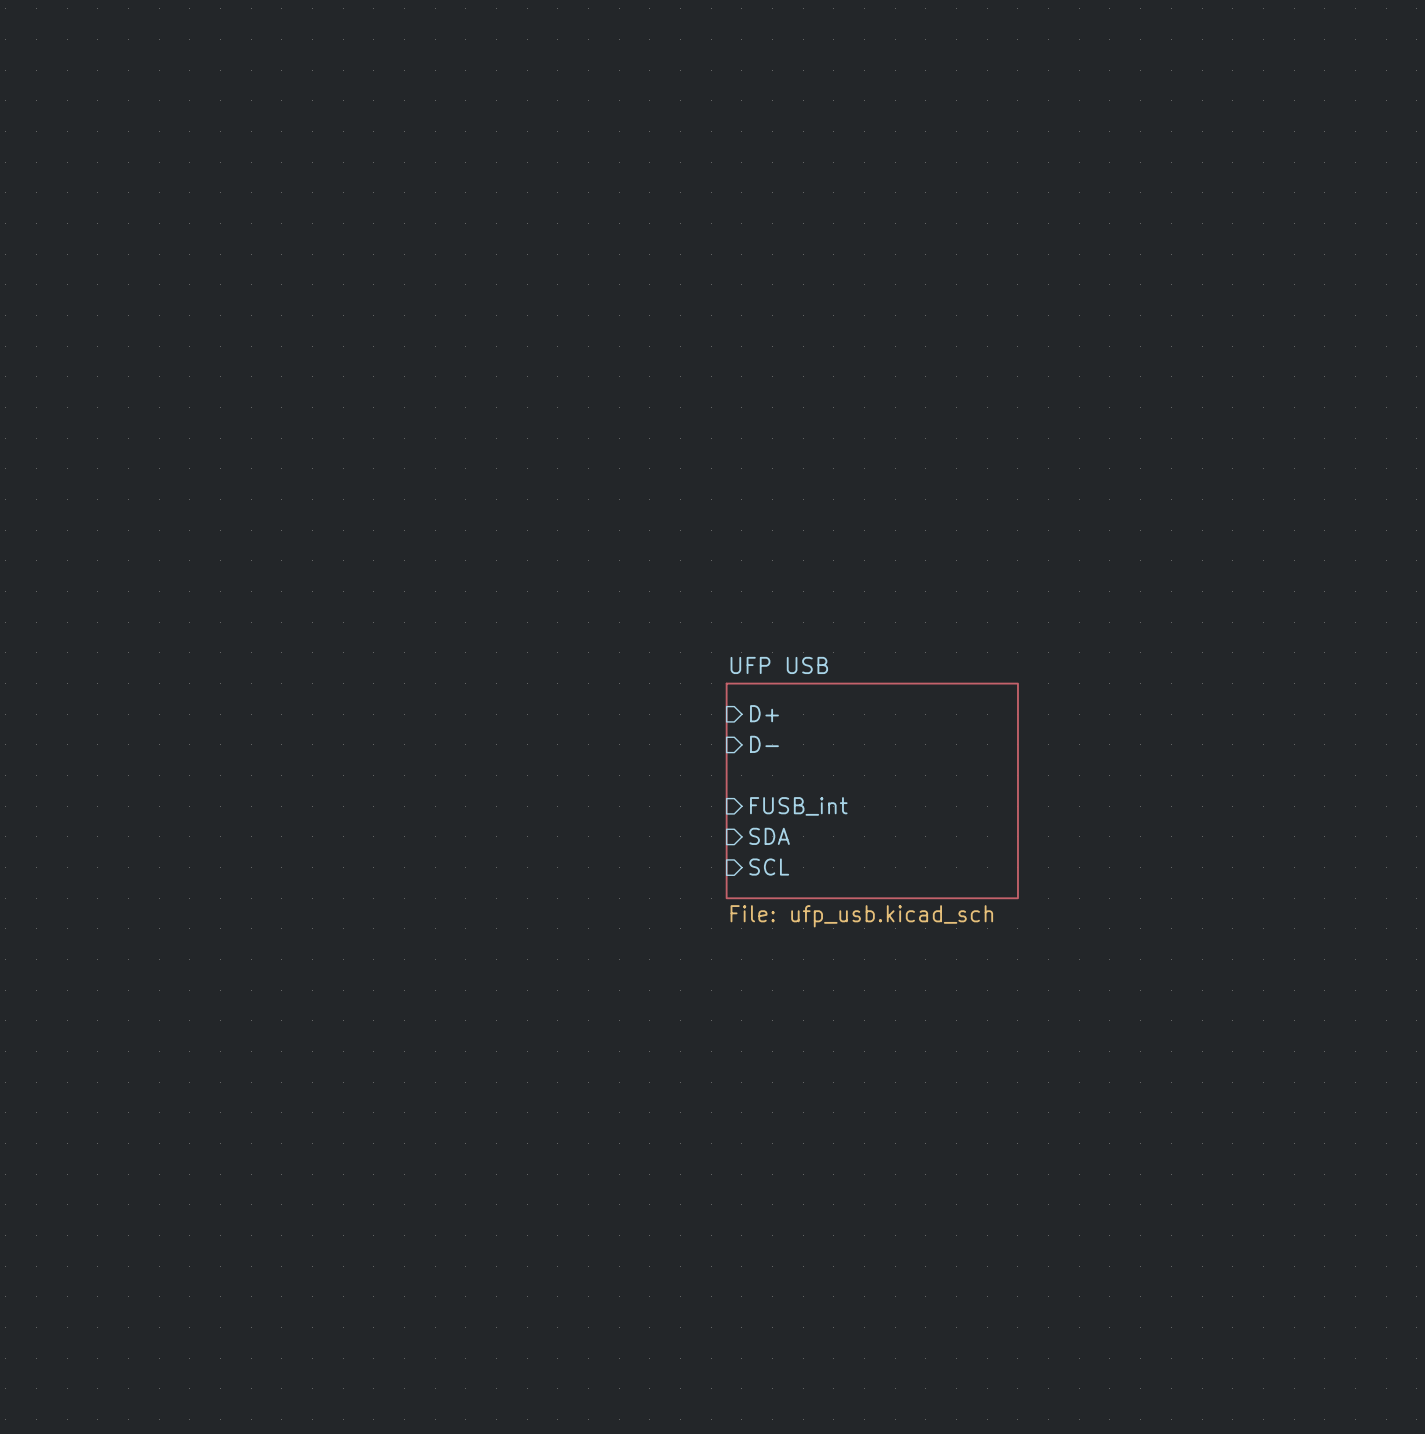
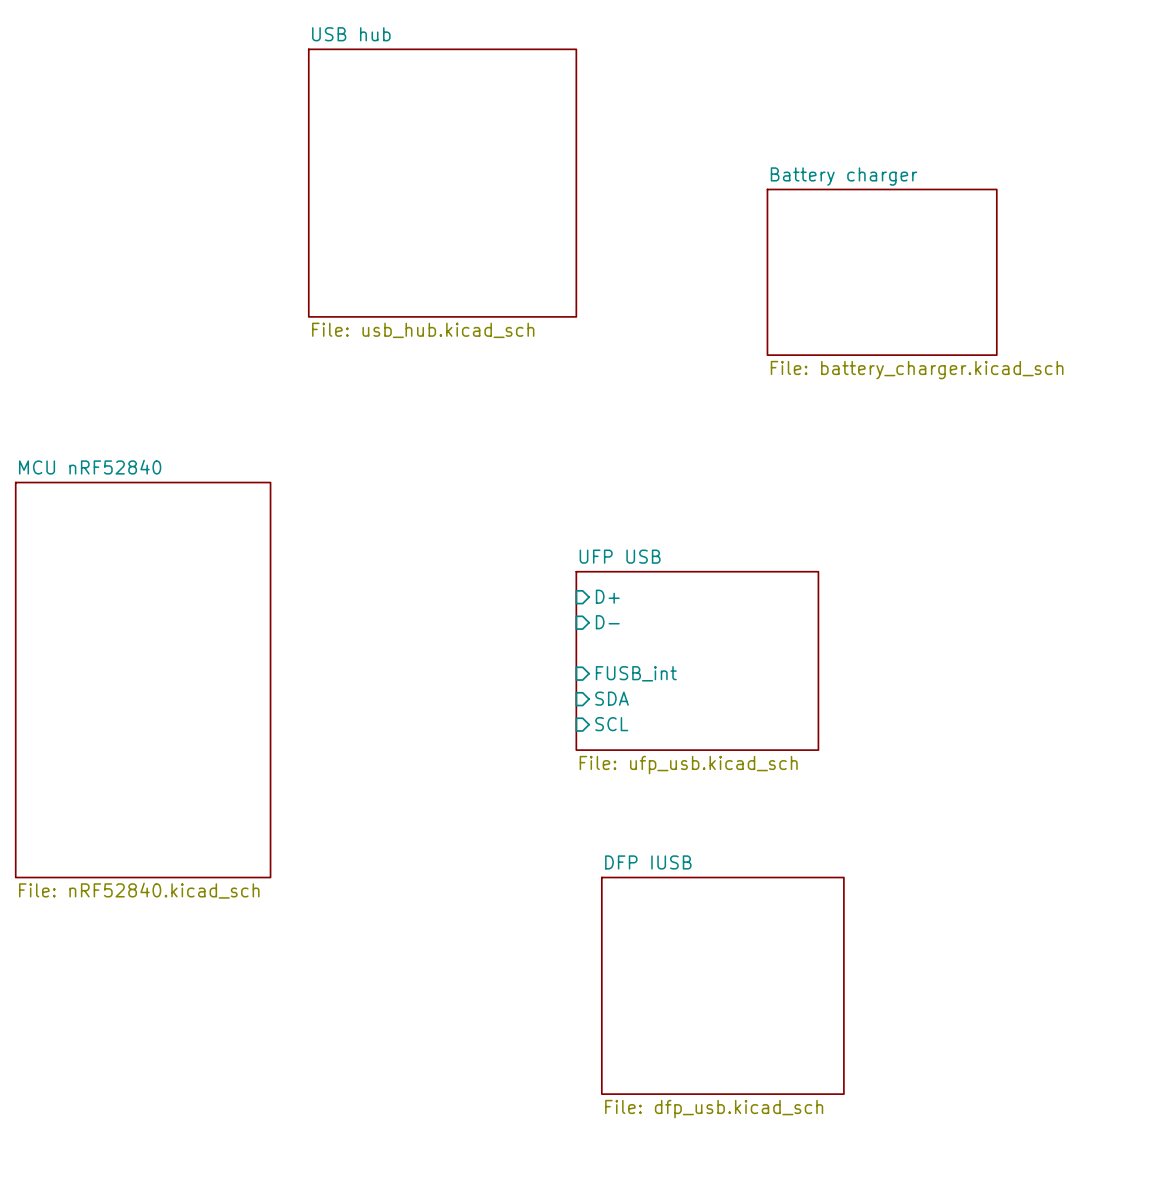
sheet USB hub: none -> File: usb_hub.kicad_sch (442, 183)
sheet Battery charger: none -> File: battery_charger.kicad_sch (882, 272)
sheet MCU nRF52840: none -> File: nRF52840.kicad_sch (143, 680)
sheet DFP IUSB: none -> File: dfp_usb.kicad_sch (722, 985)

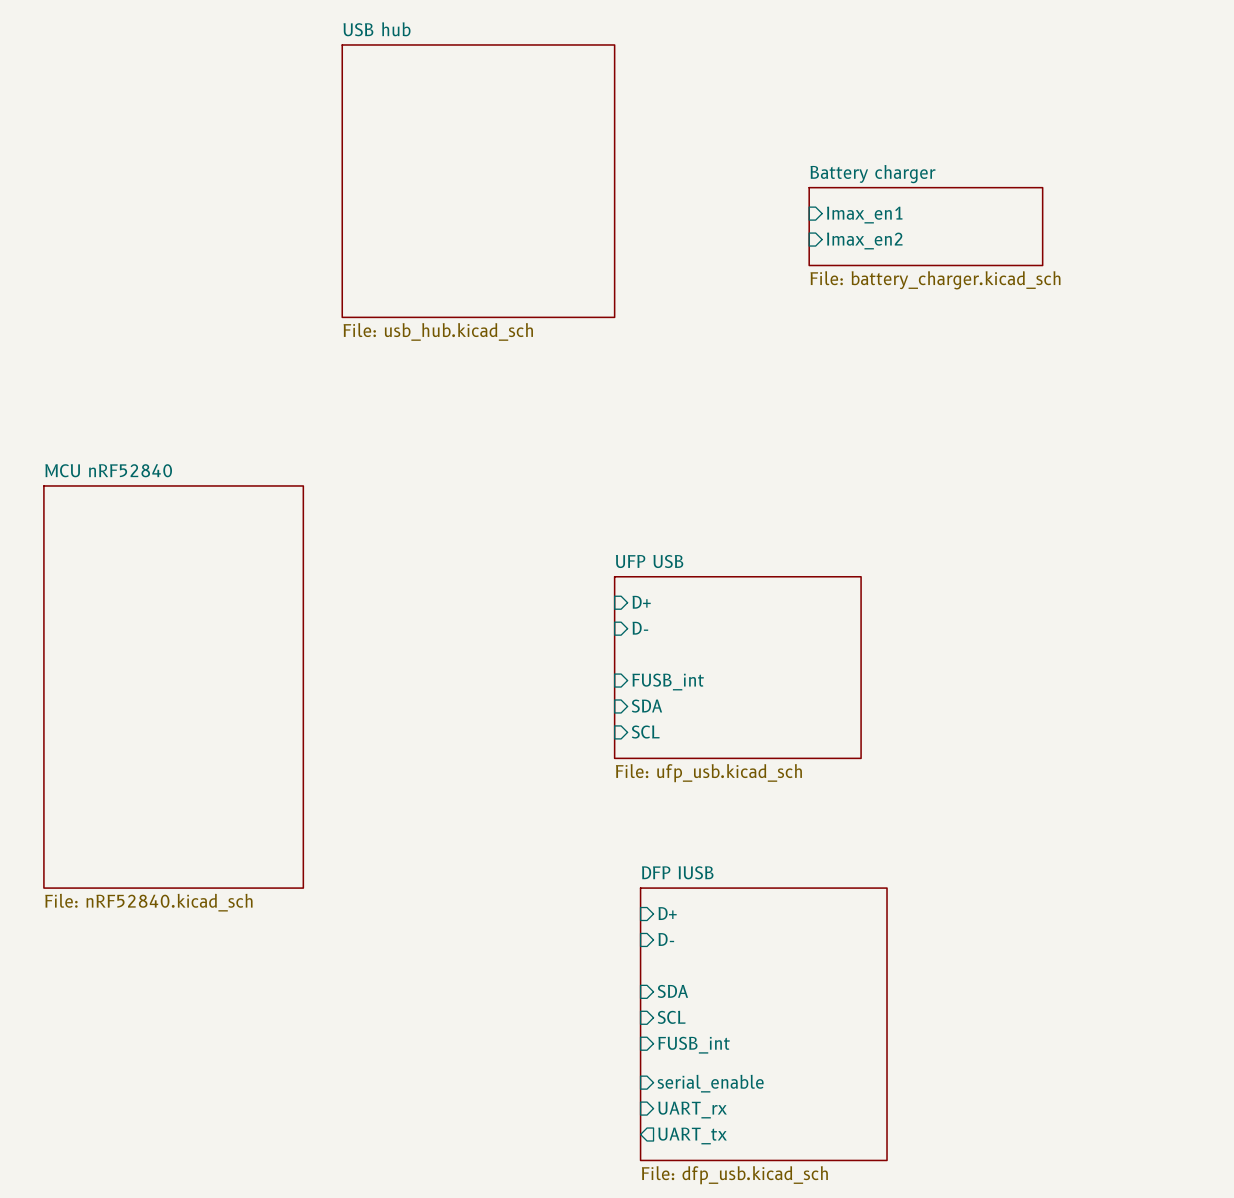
sheet pin: none -> Imax_en1 (864, 215)
sheet Battery charger: none -> File: battery_charger.kicad_sch (925, 226)
sheet pin: none -> Imax_en2 (864, 241)
sheet Battery charger: File: battery_charger.kicad_sch (882, 272) -> none
sheet pin: none -> D+ (667, 913)
sheet pin: none -> D- (666, 939)
sheet pin: none -> SDA (672, 991)
sheet DFP IUSB: File: dfp_usb.kicad_sch (722, 985) -> none
sheet pin: none -> SCL (671, 1017)
sheet DFP IUSB: none -> File: dfp_usb.kicad_sch (763, 1024)
sheet pin: none -> FUSB_int (694, 1045)
sheet pin: none -> serial_enable (710, 1083)
sheet pin: none -> UART_rx (692, 1110)
sheet pin: none -> UART_tx (692, 1135)

